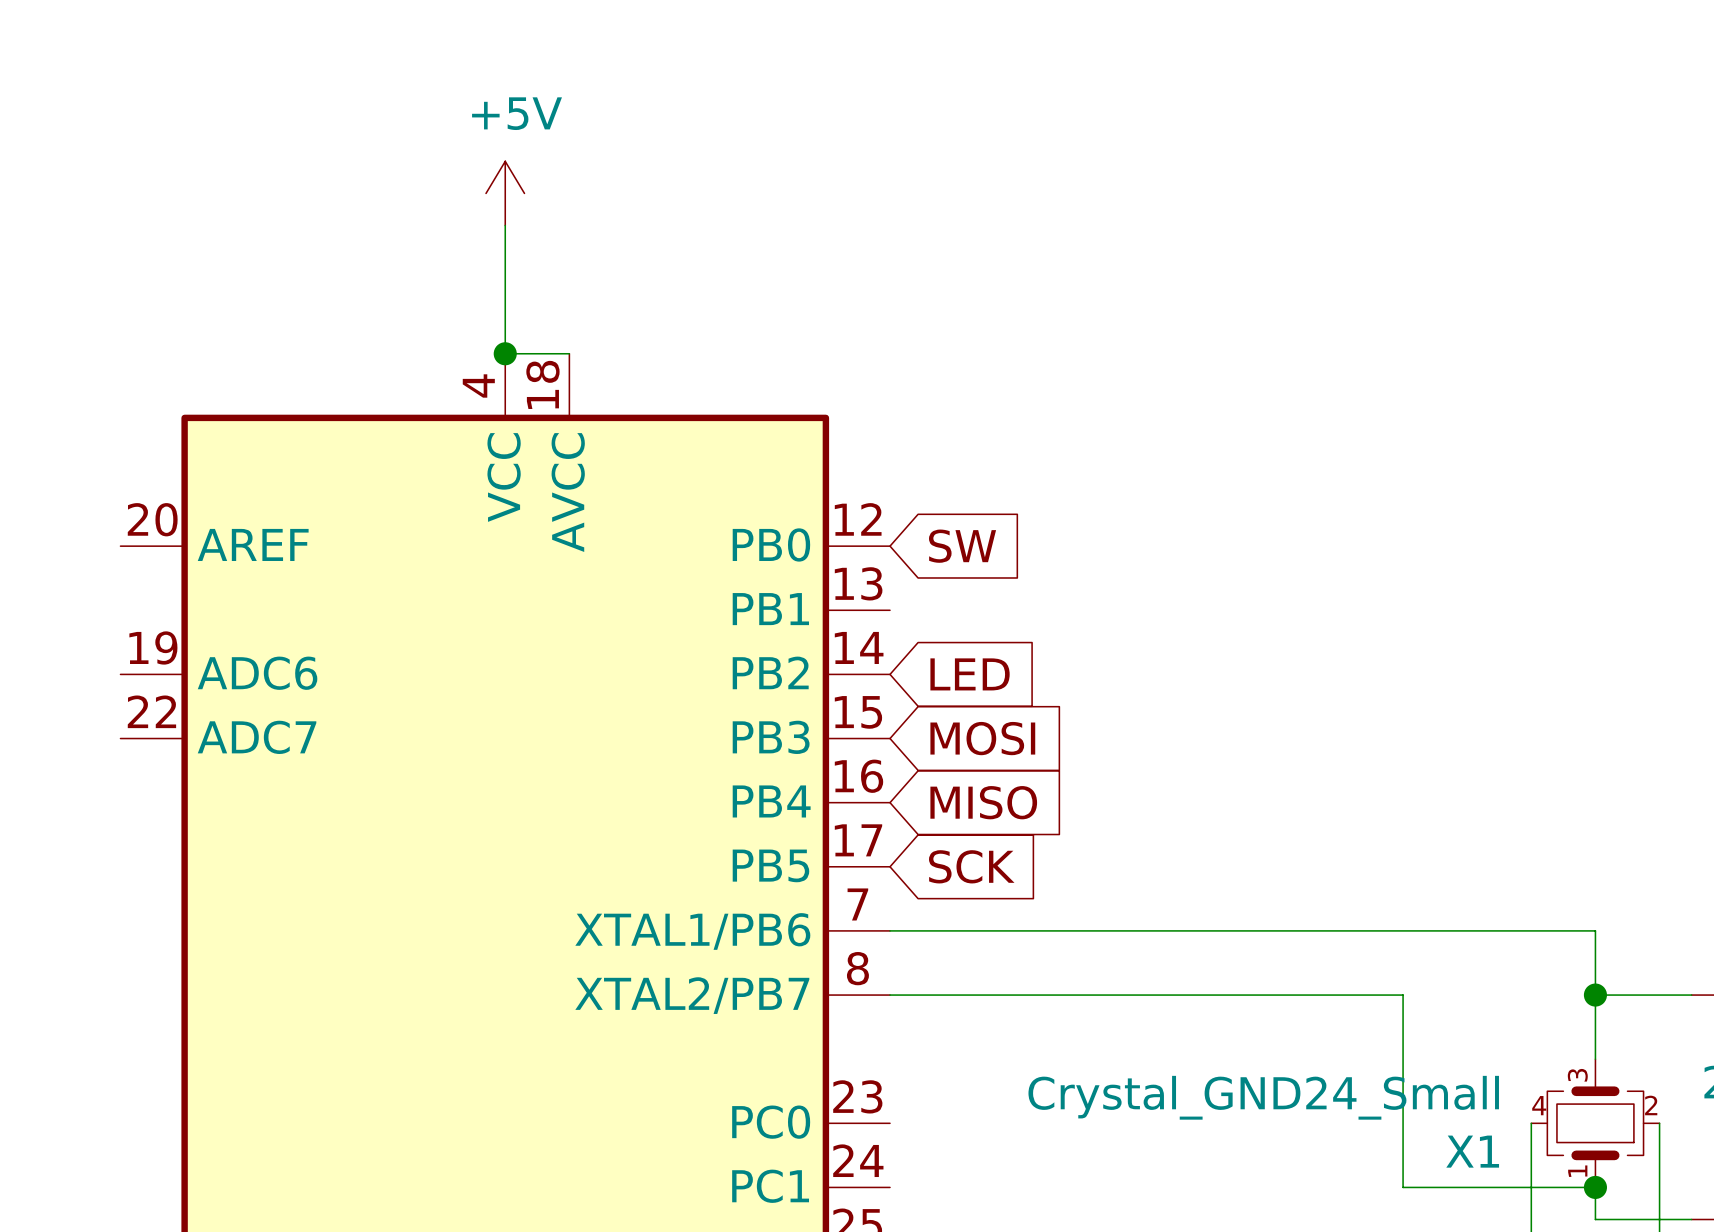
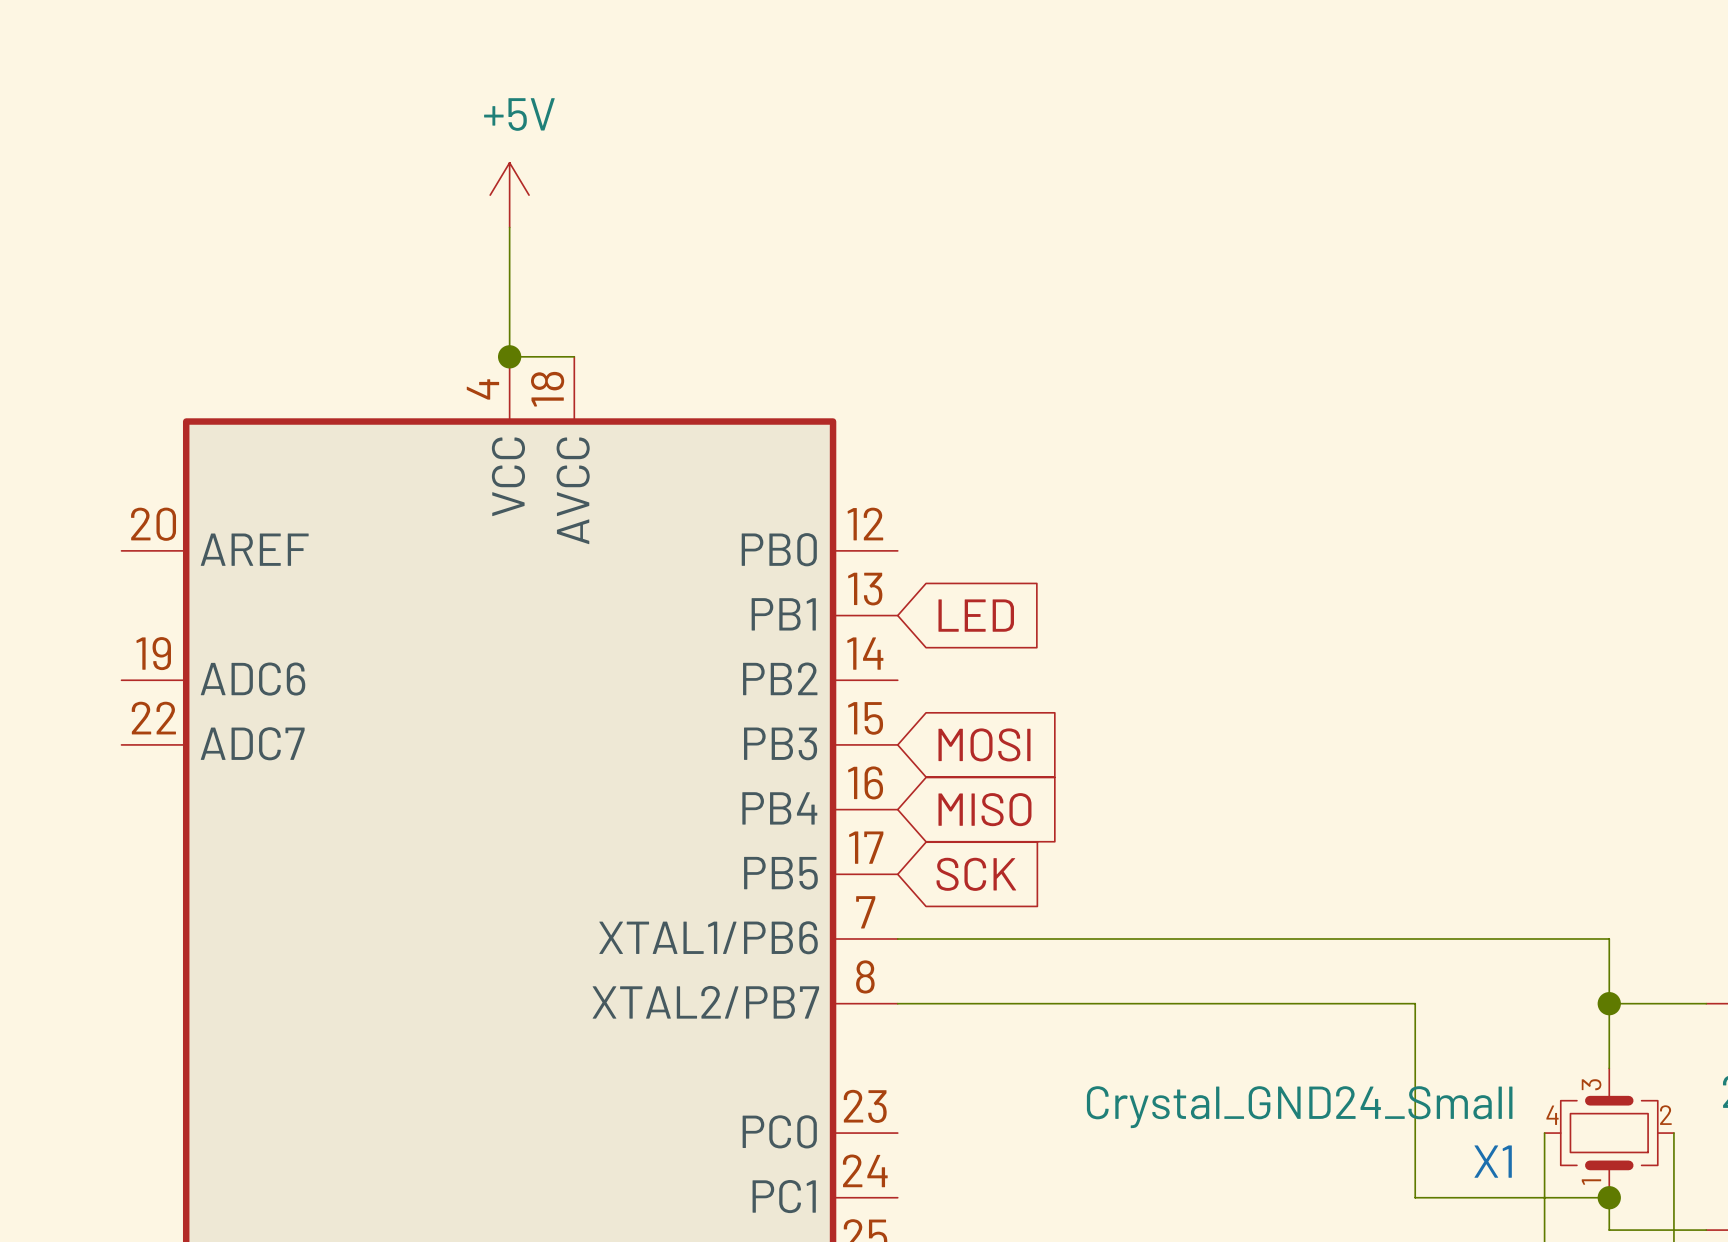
global label: SW (962, 546) -> none
global label position: LED (970, 674) -> LED (976, 615)

